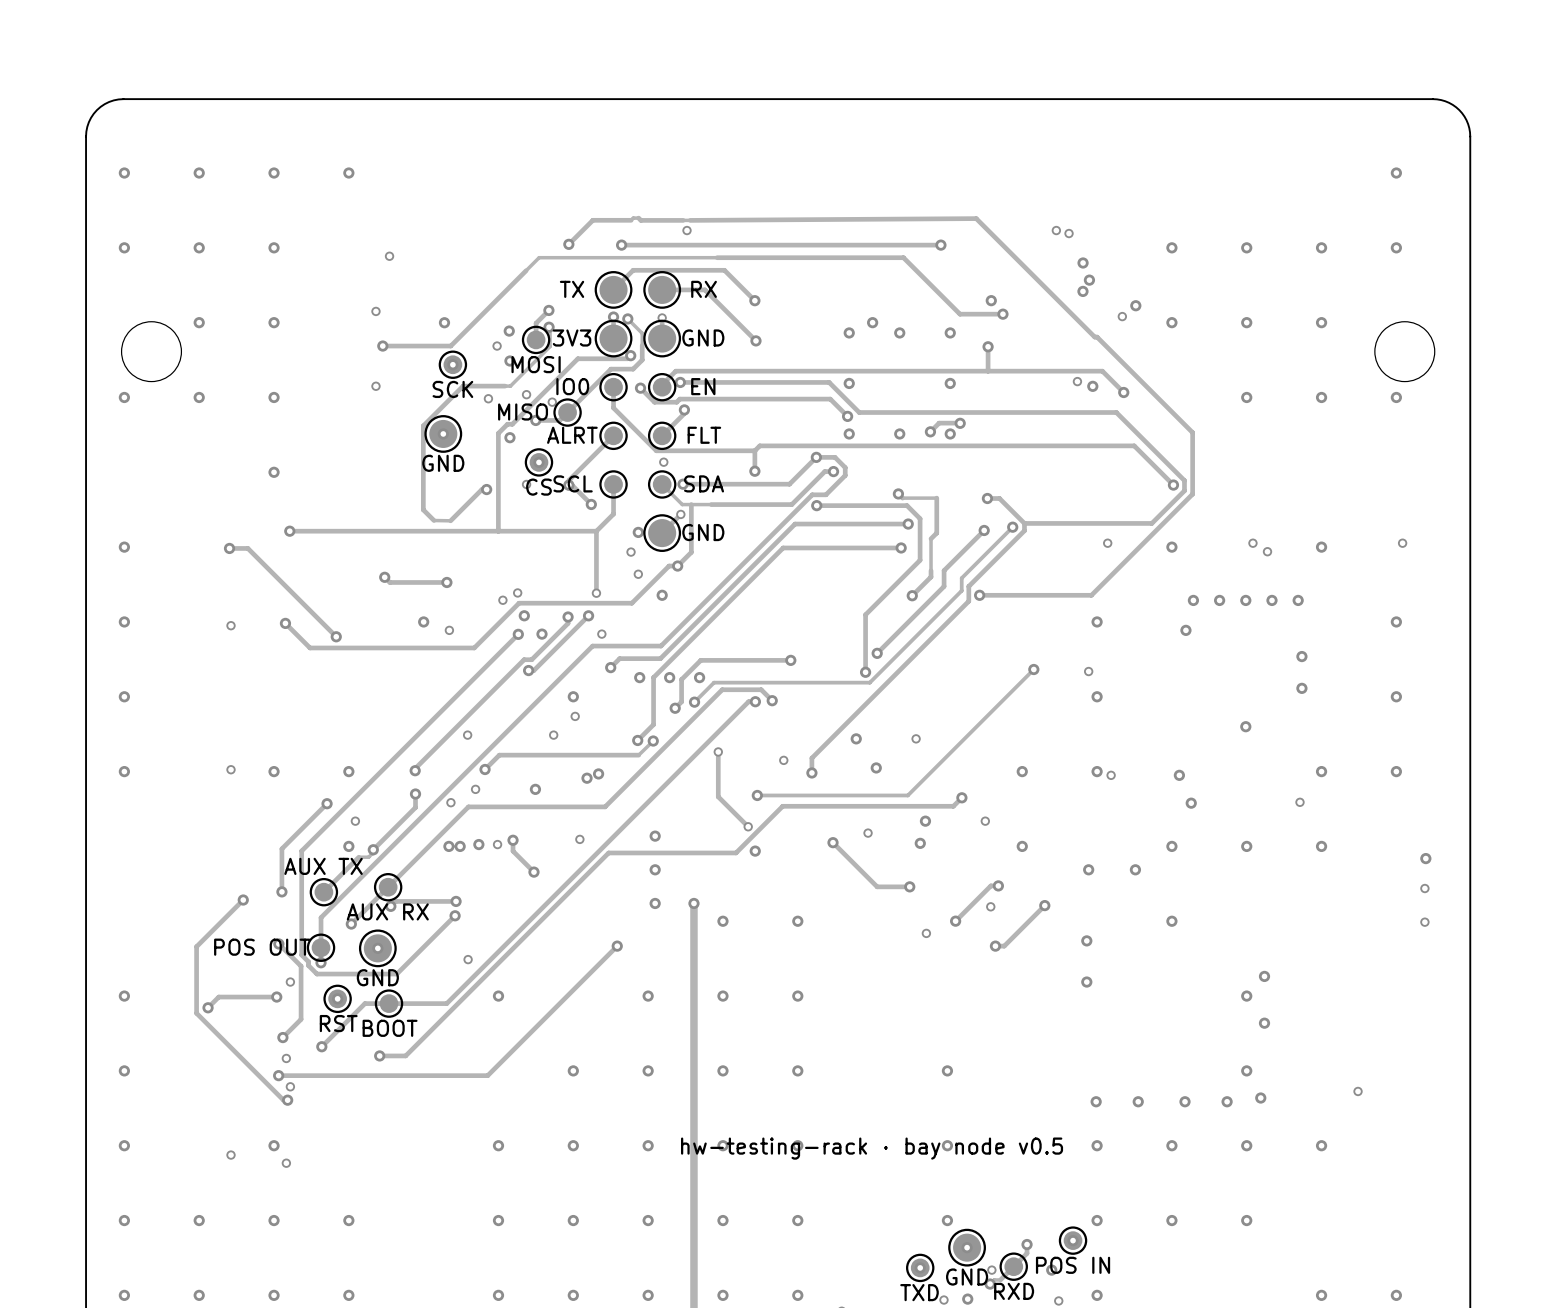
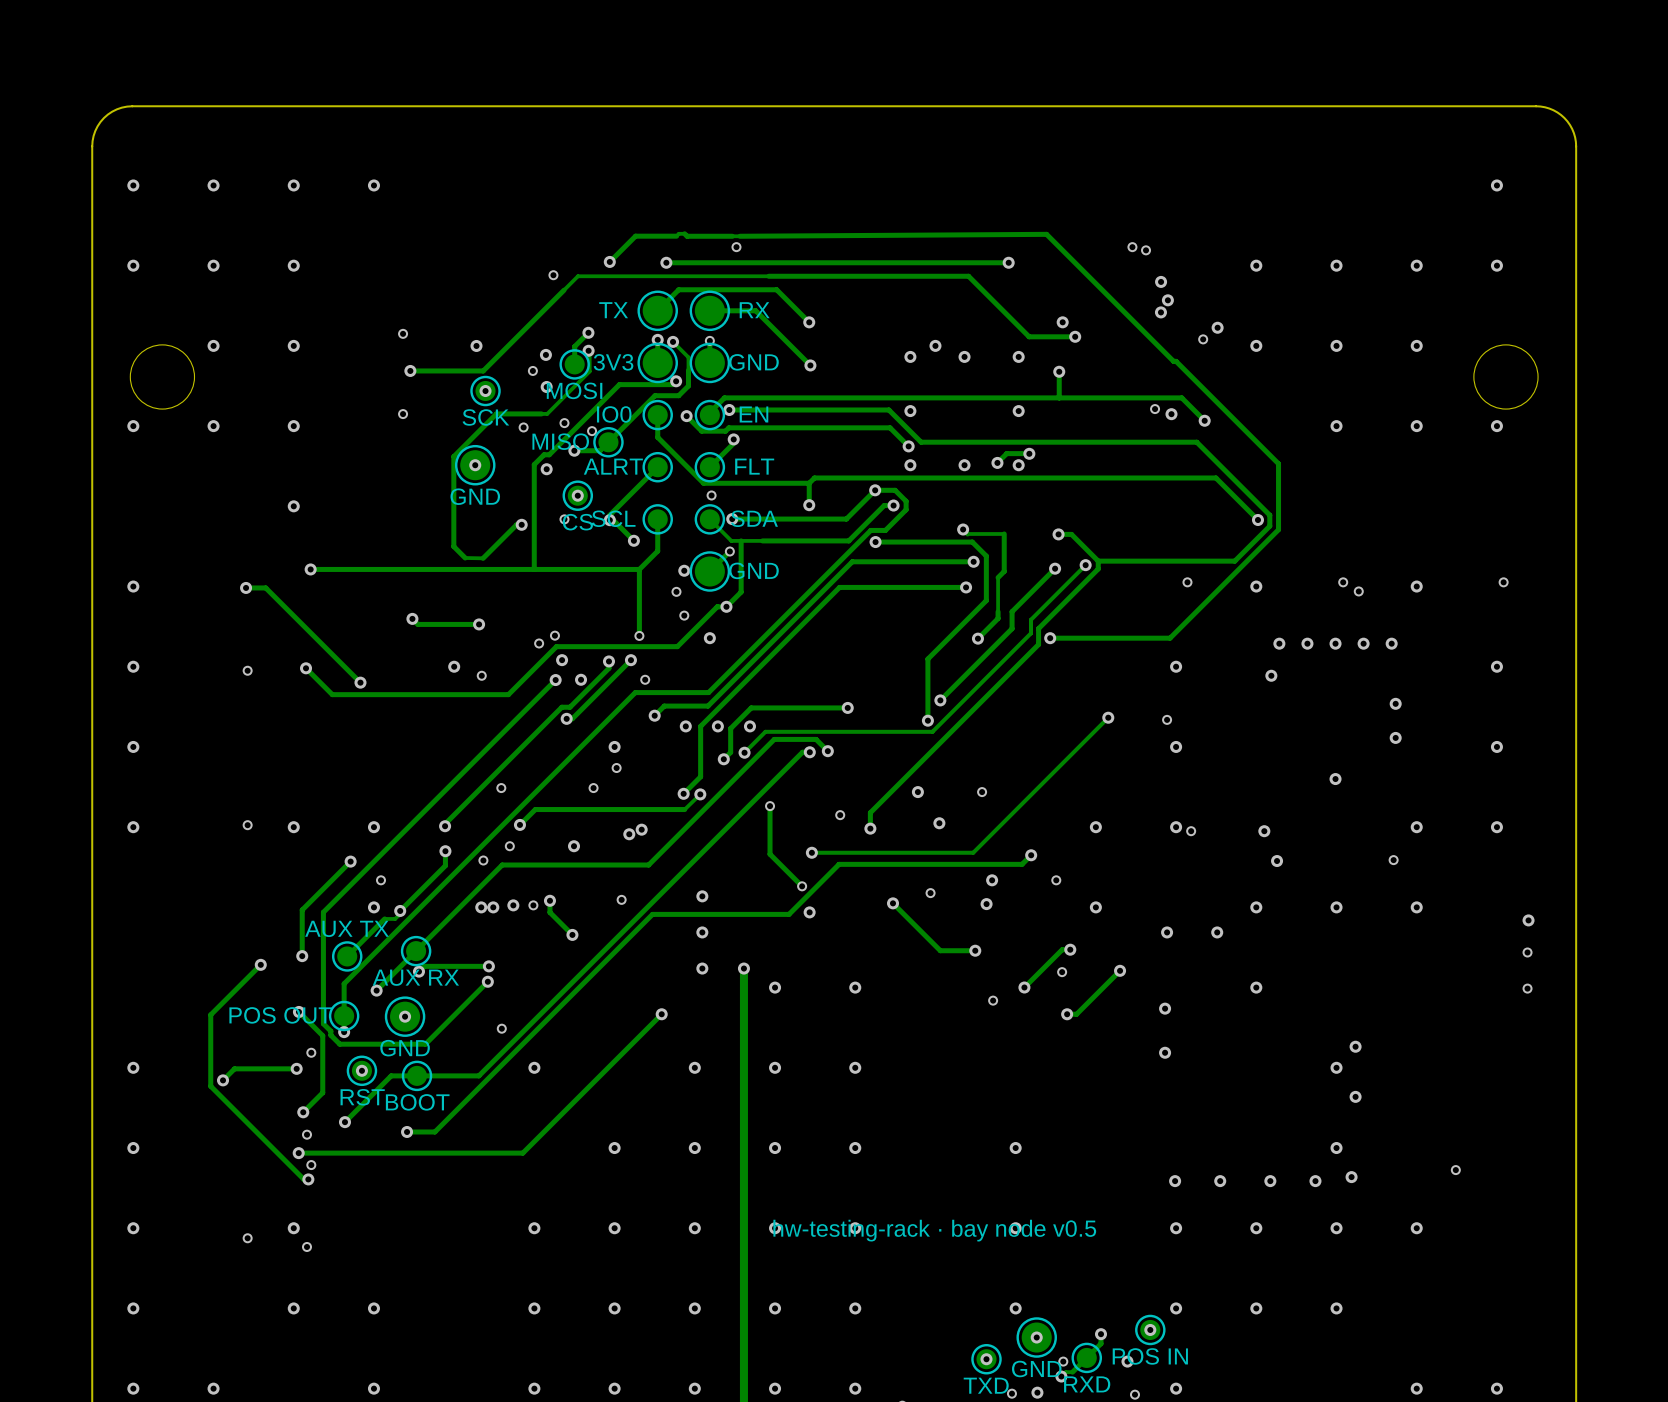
via: (389, 256) -> none
via: none -> (553, 275)
via: (199, 1220) -> none
via: (274, 1295) -> none

